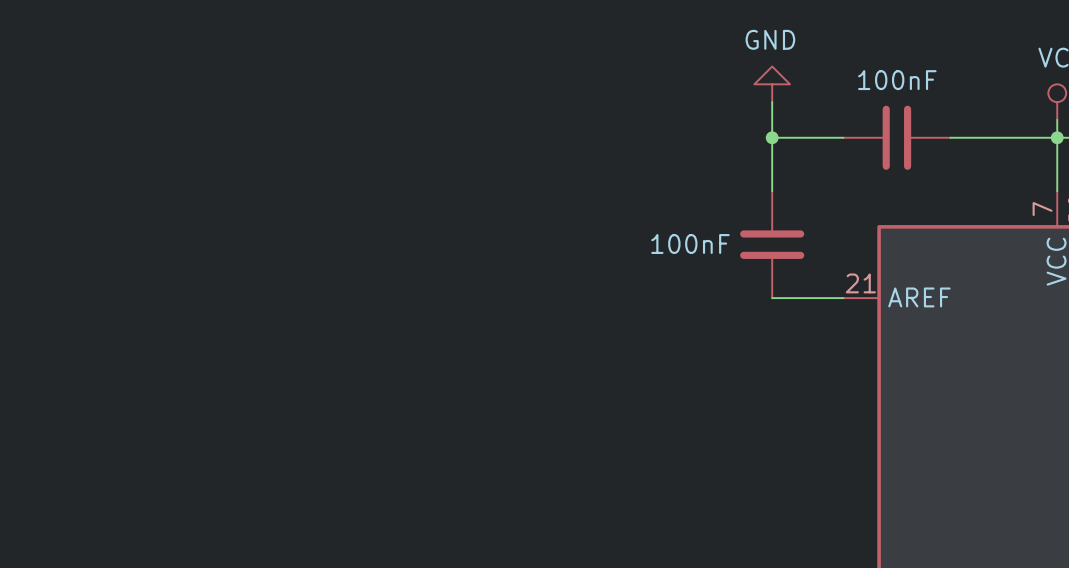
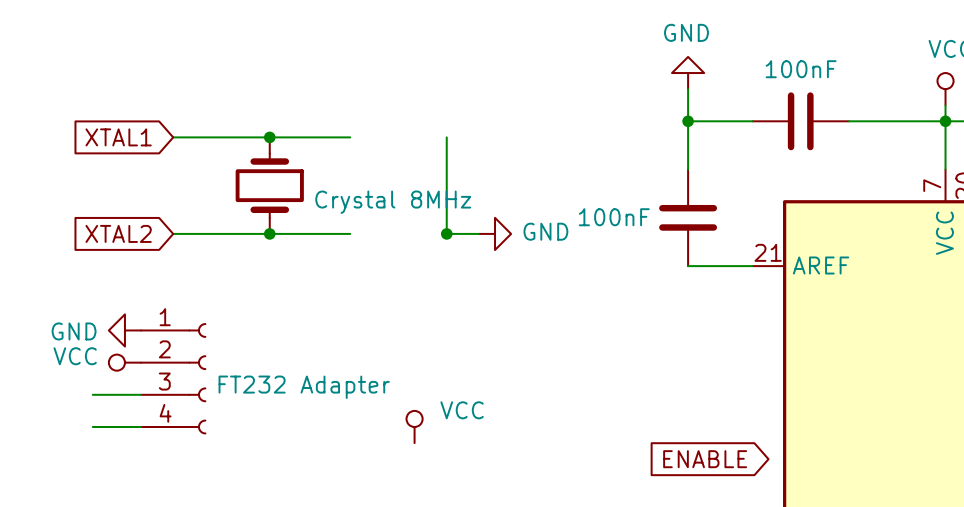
global label: none -> XTAL1 (118, 137)
wire: none -> (173, 137) (350, 137)
junction: none -> (269, 137)
wire: none -> (446, 137) (446, 233) (478, 233)
part: none -> Crystal 8MHz (269, 185)
global label: none -> XTAL2 (118, 233)
wire: none -> (173, 233) (350, 233)
junction: none -> (269, 233)
junction: none -> (446, 233)
power symbol: none -> GND (495, 233)
power symbol: none -> GND (124, 330)
power symbol: none -> VCC (124, 362)
part: none -> FT232 Adapter (173, 378)
wire: none -> (92, 394) (141, 394)
wire: none -> (92, 427) (141, 427)
power symbol: none -> VCC (414, 427)
global label: none -> ENABLE (705, 459)

